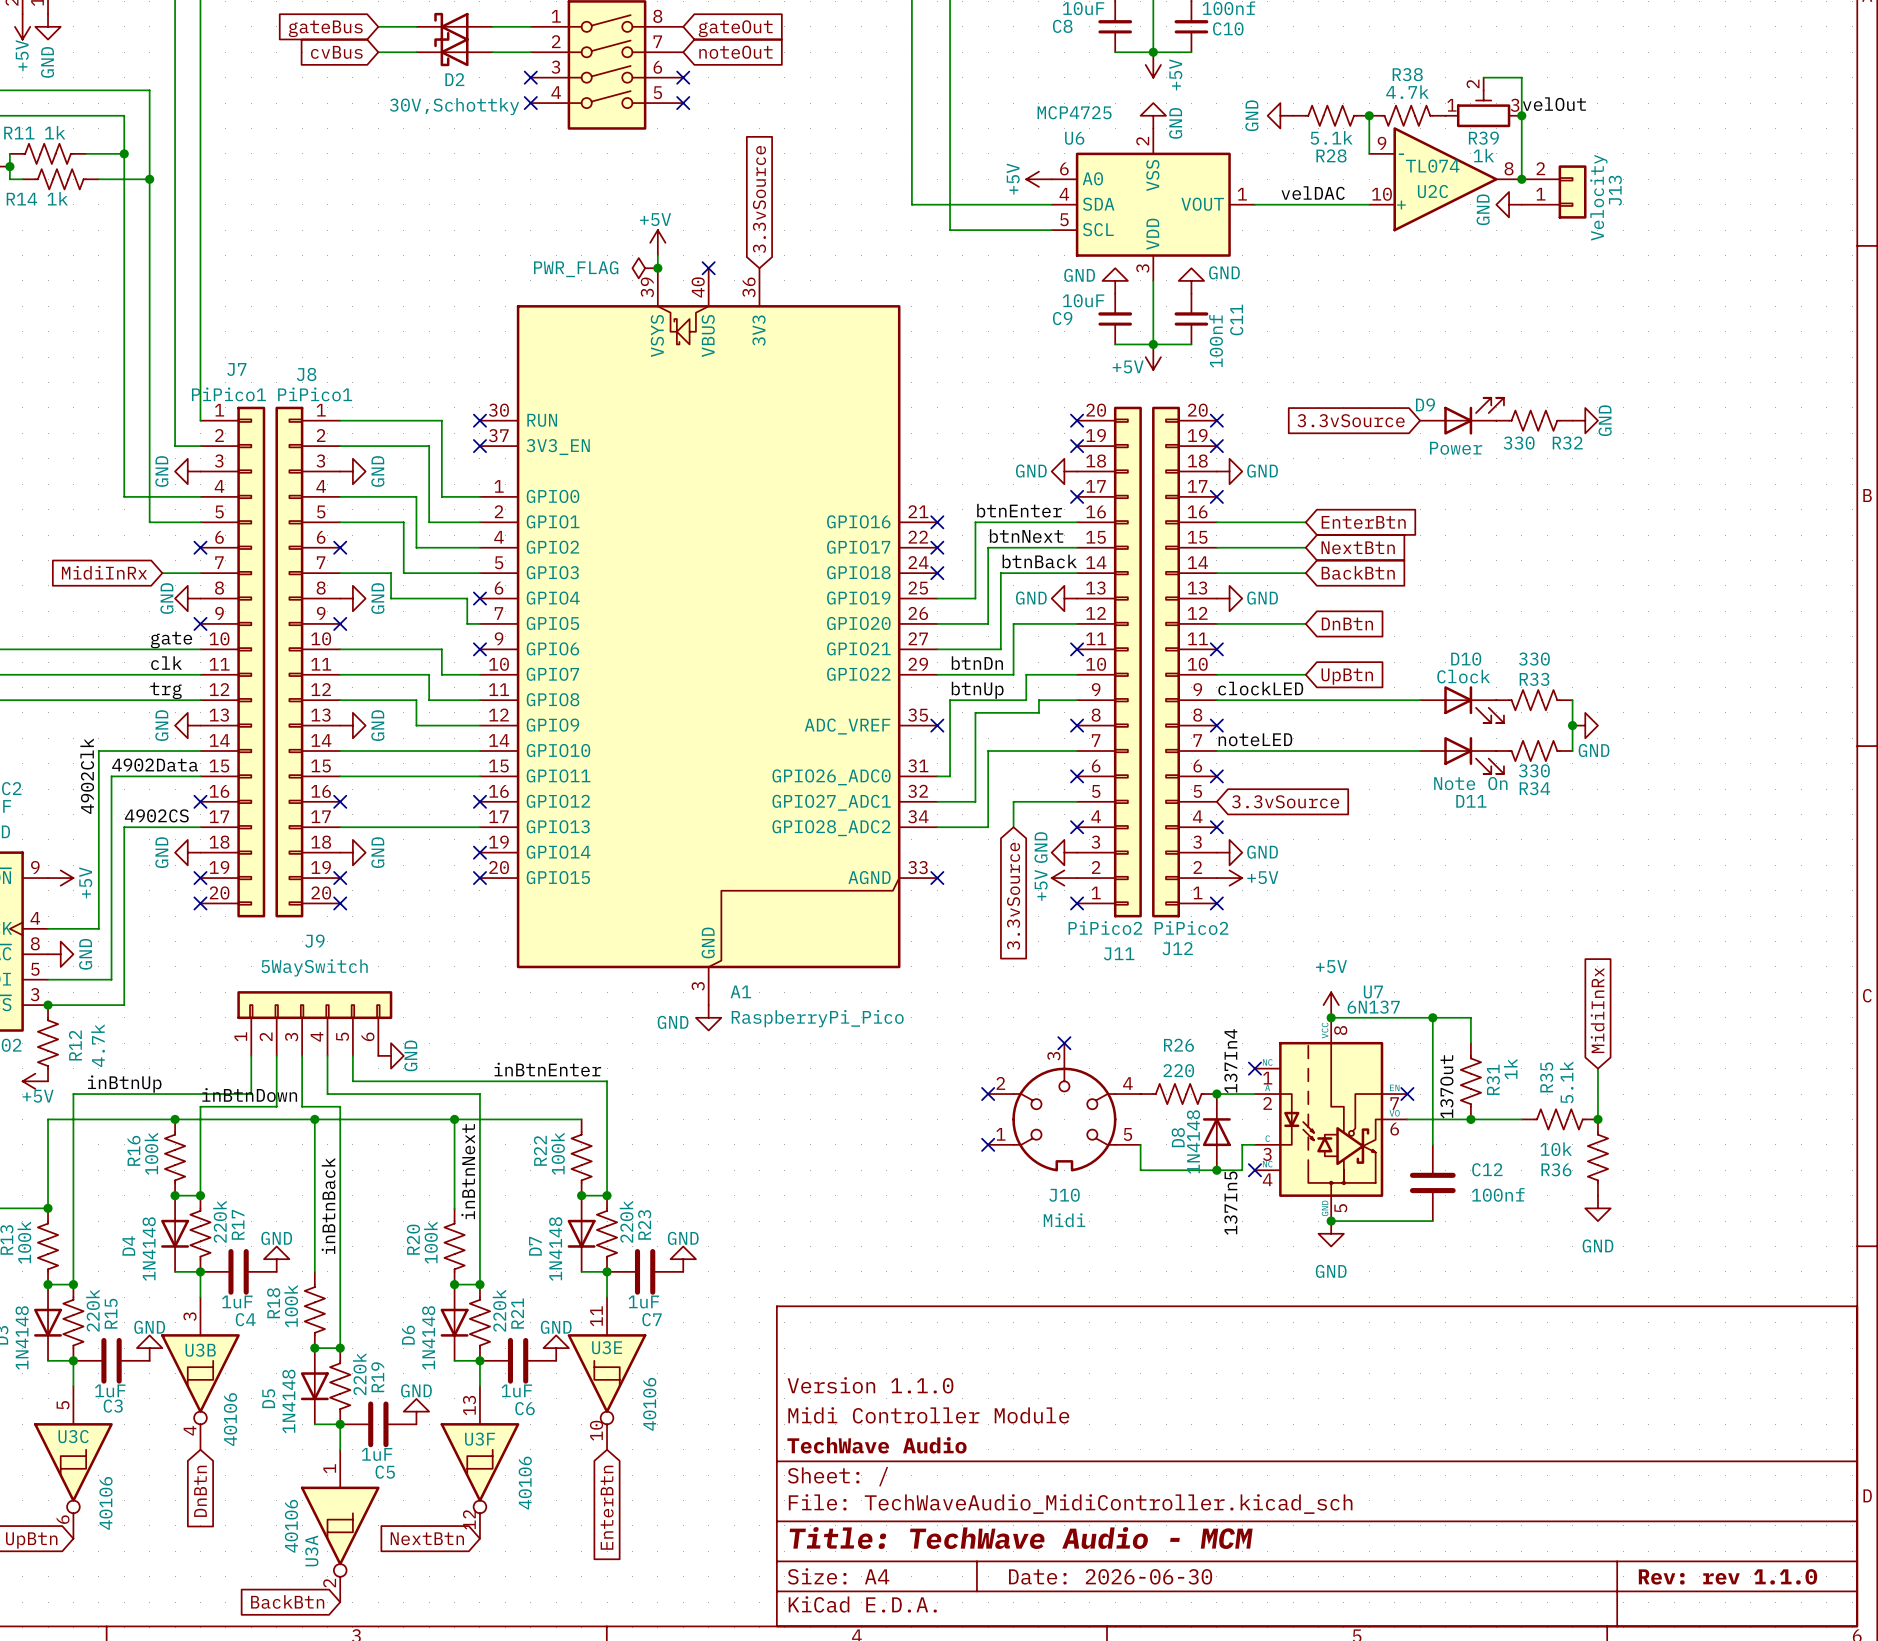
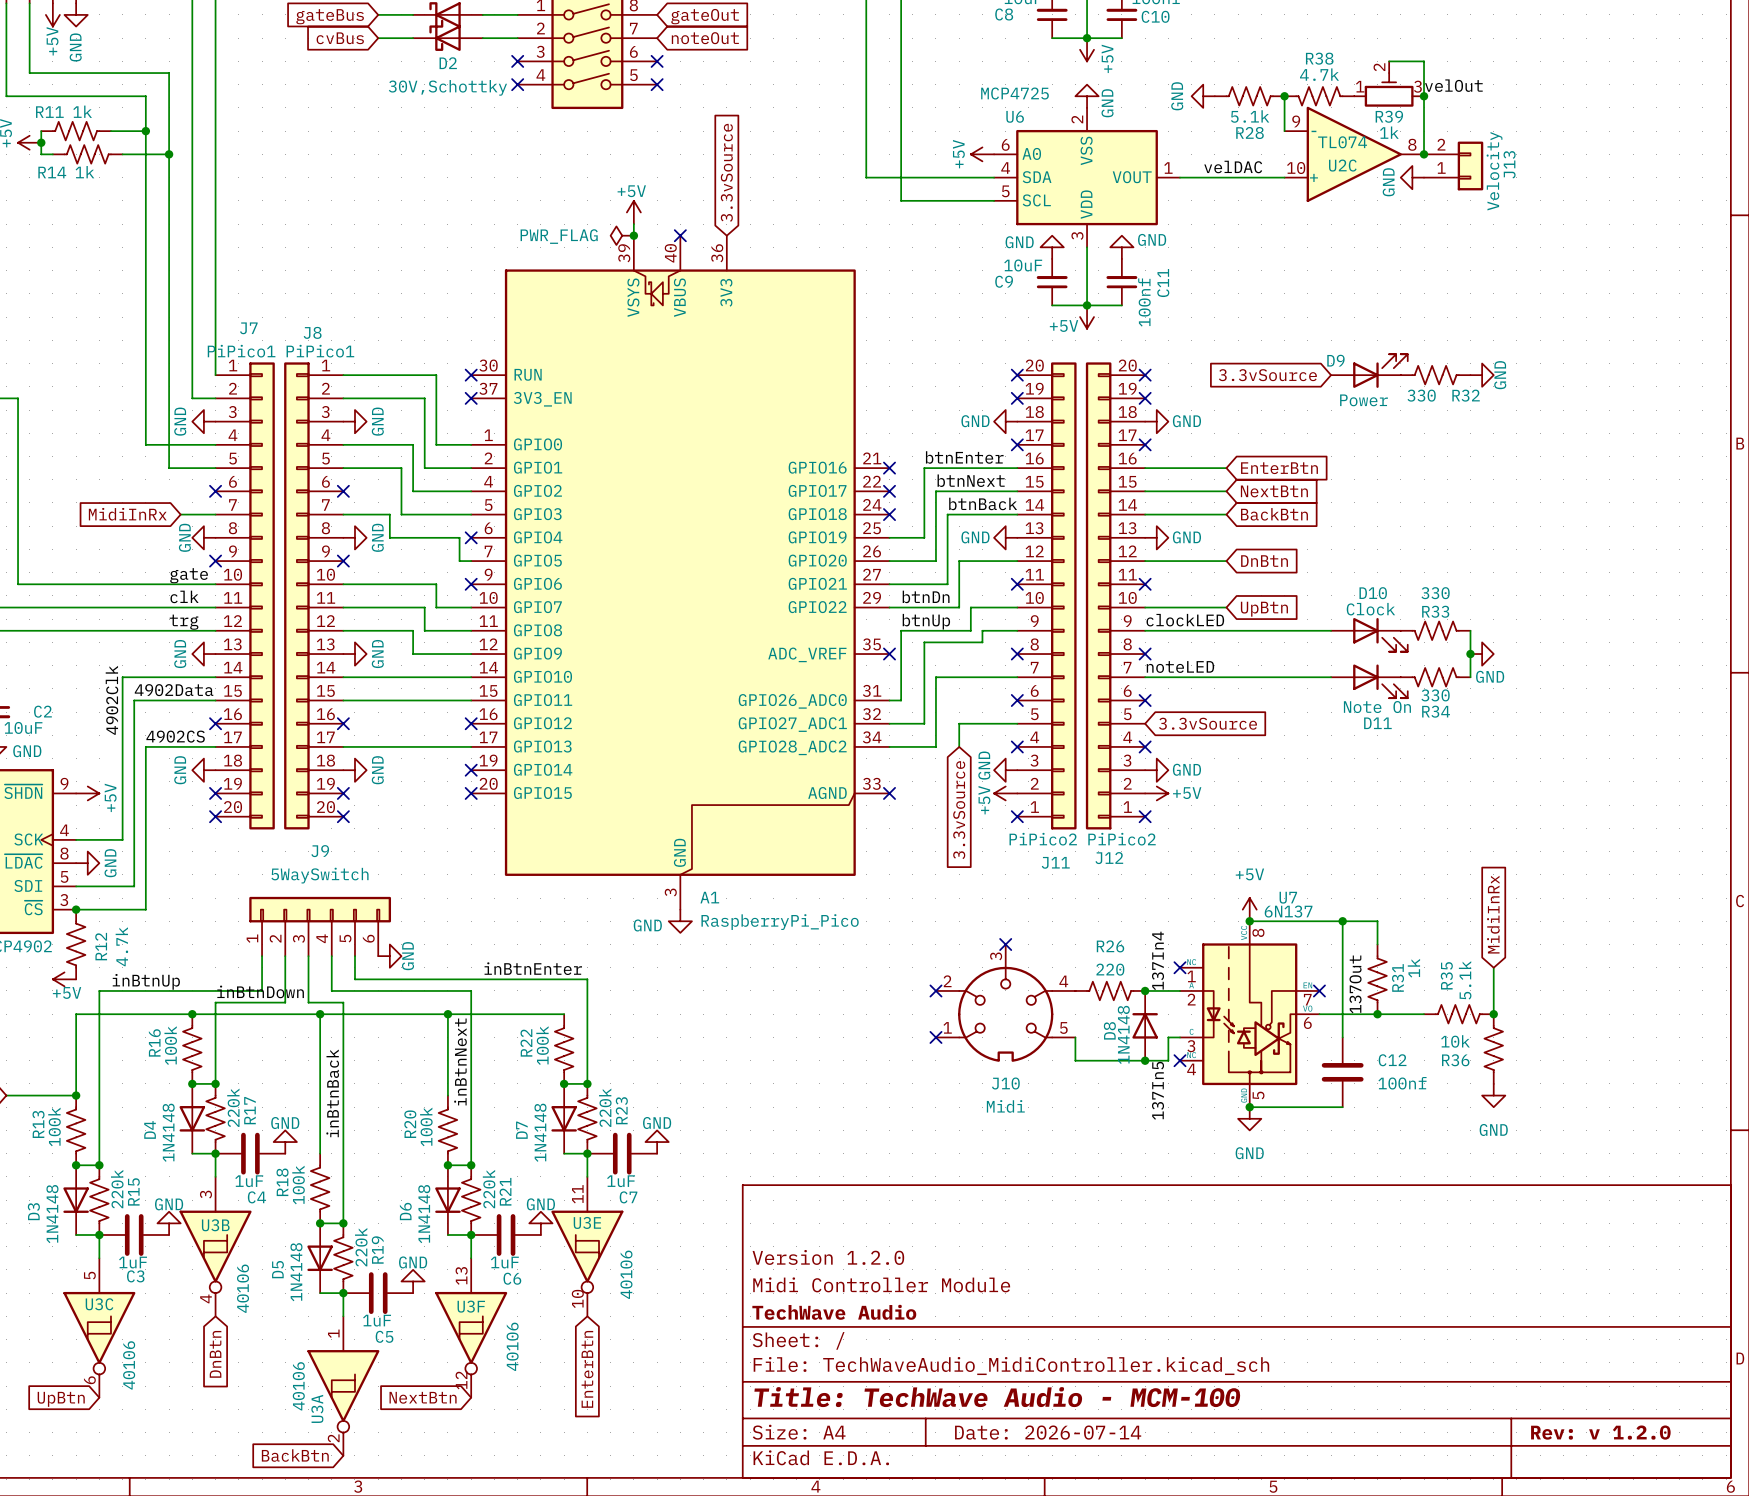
title block: Version 1.1.0 (870, 1385) -> Version 1.2.0 (828, 1257)
title block: Title: TechWave Audio - MCM (1021, 1538) -> Title: TechWave Audio - MCM-100 (997, 1397)
title block: Date: 2026-06-30 (1110, 1576) -> Date: 2026-07-14 (1048, 1432)
title block: Rev: rev 1.1.0 (1728, 1576) -> Rev: v 1.2.0 (1600, 1432)

